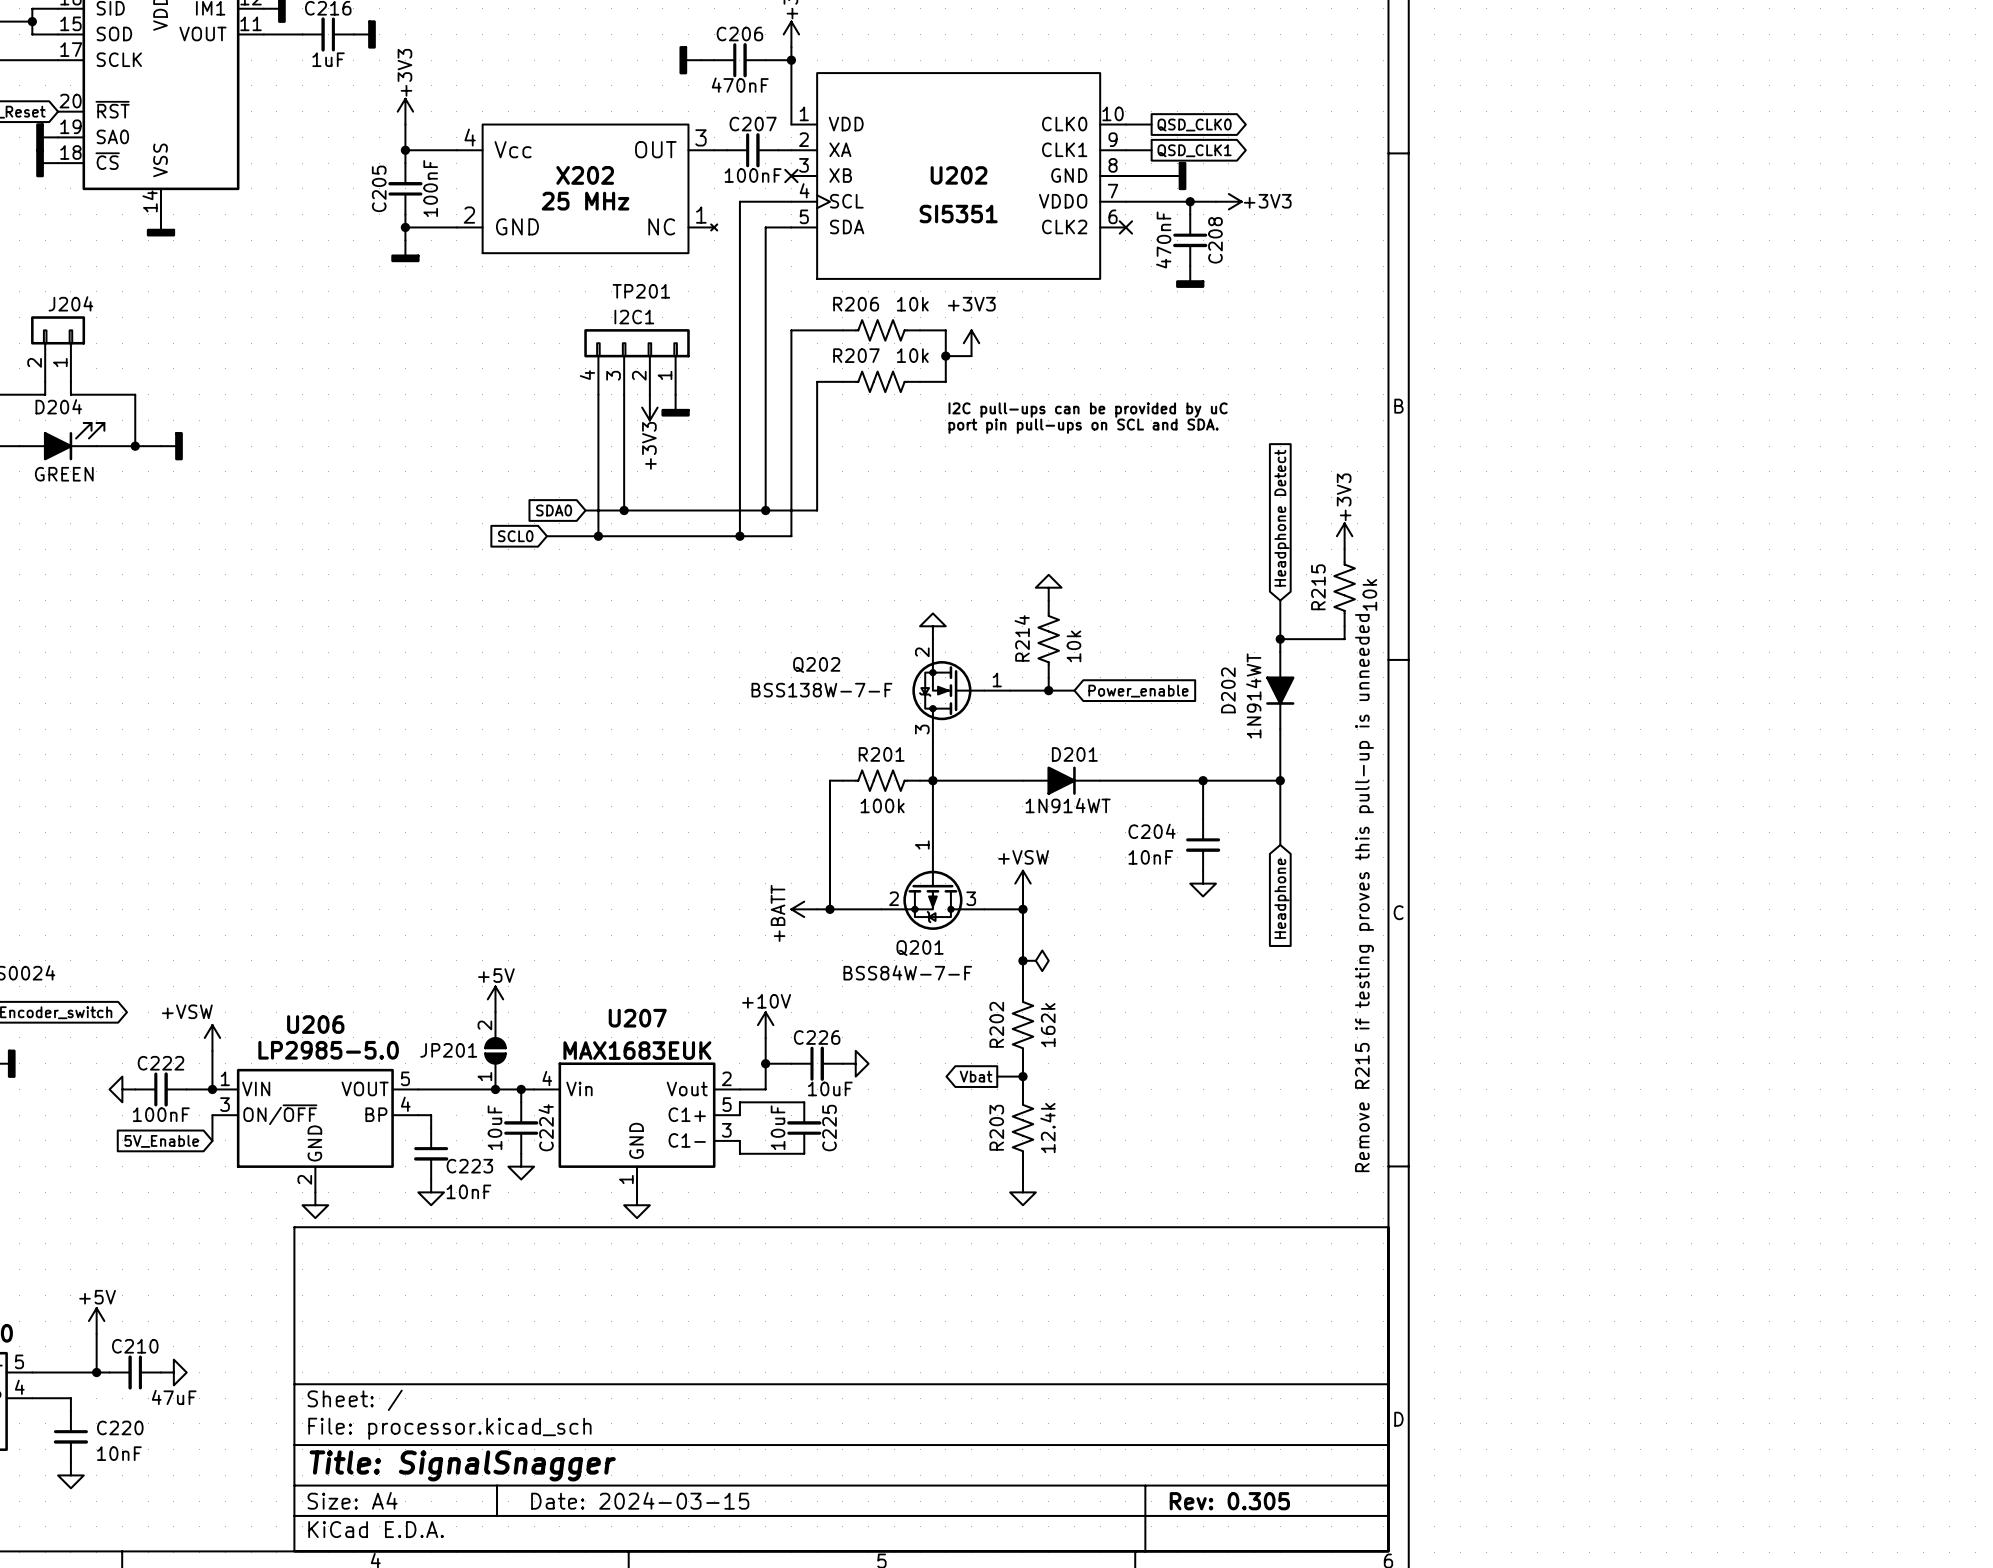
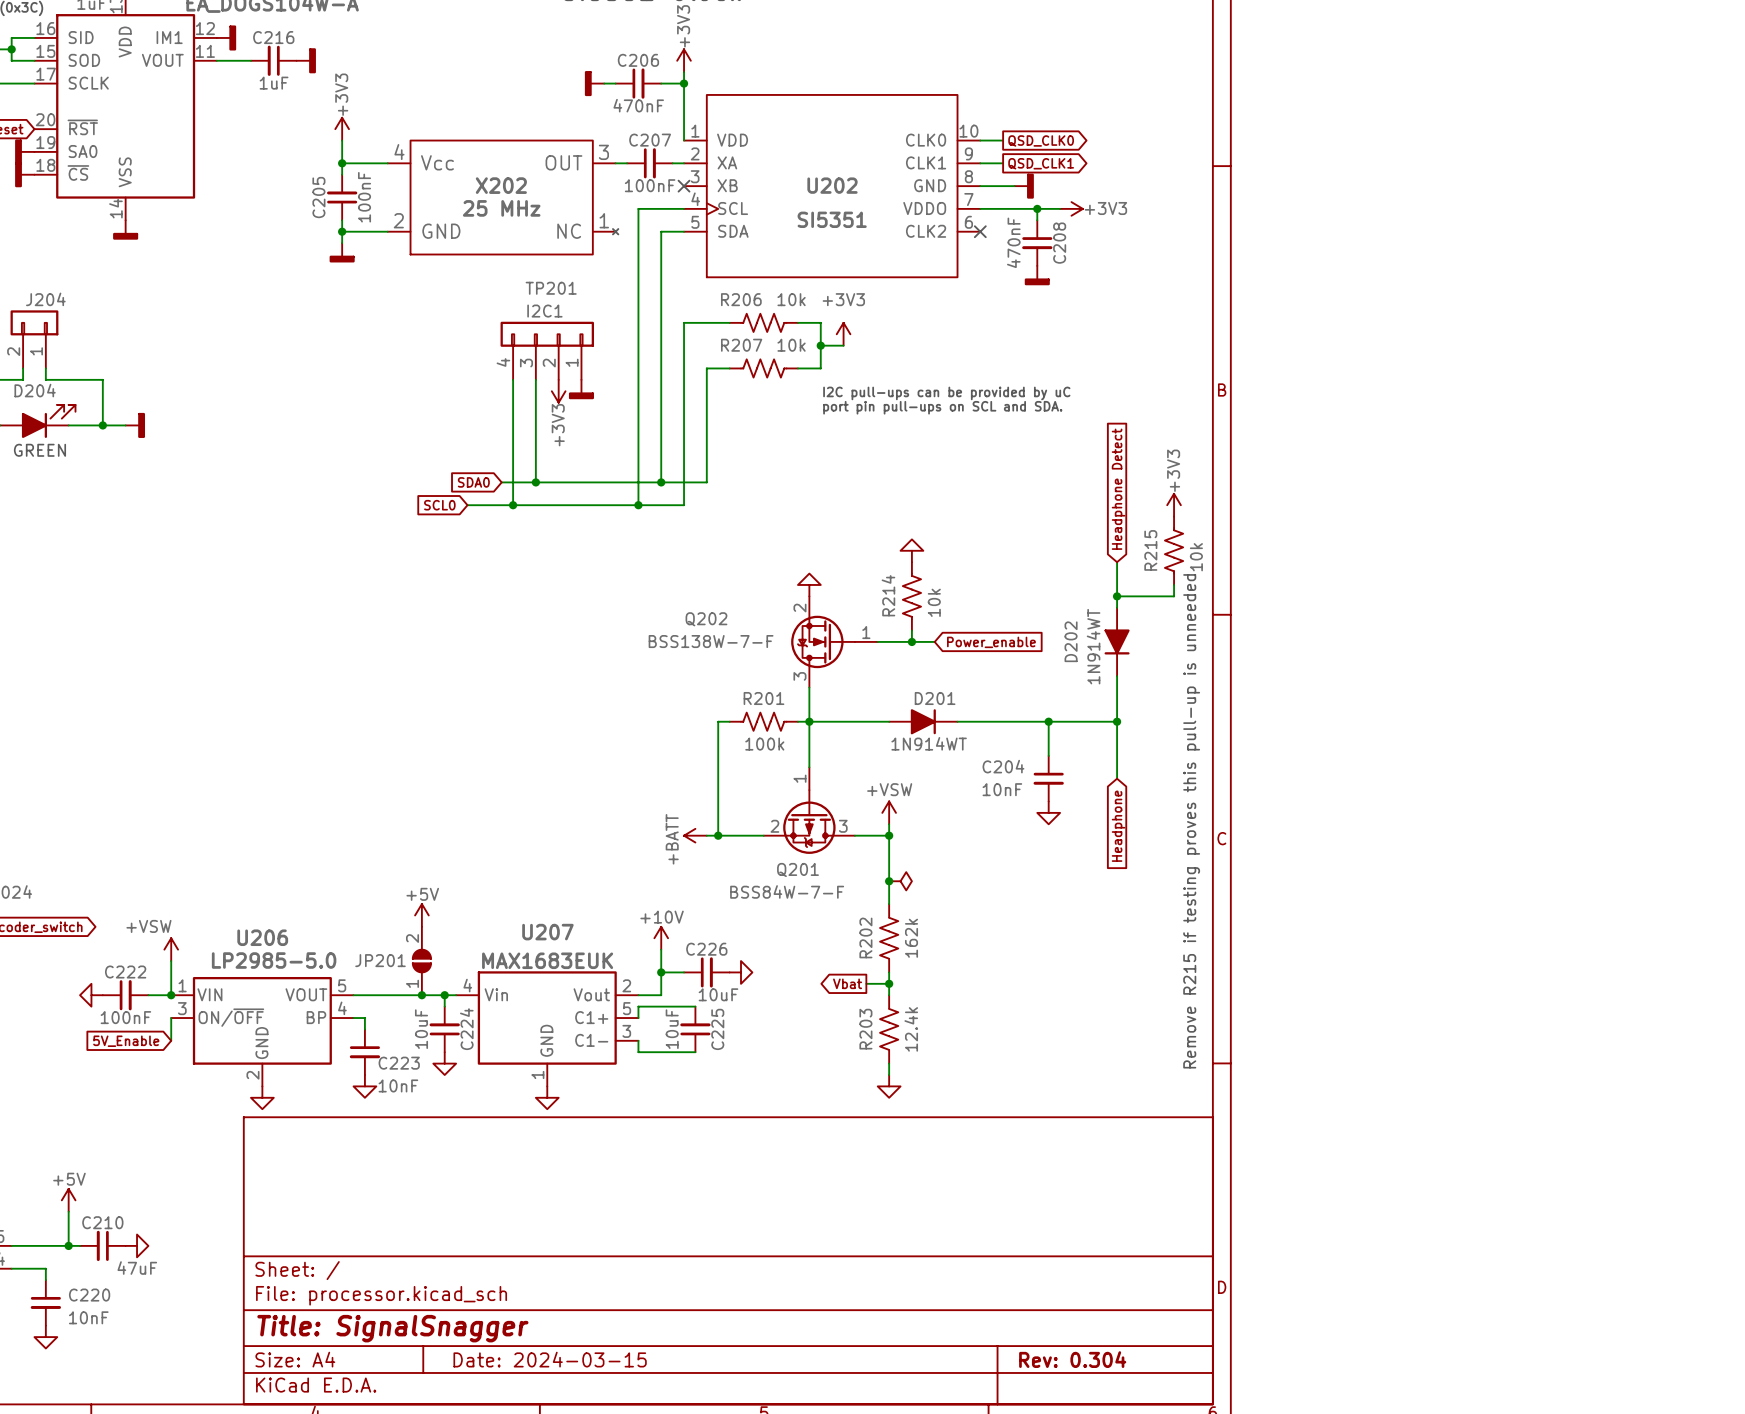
title block: Rev: 0.305 (1229, 1501) -> Rev: 0.304 (1072, 1359)

